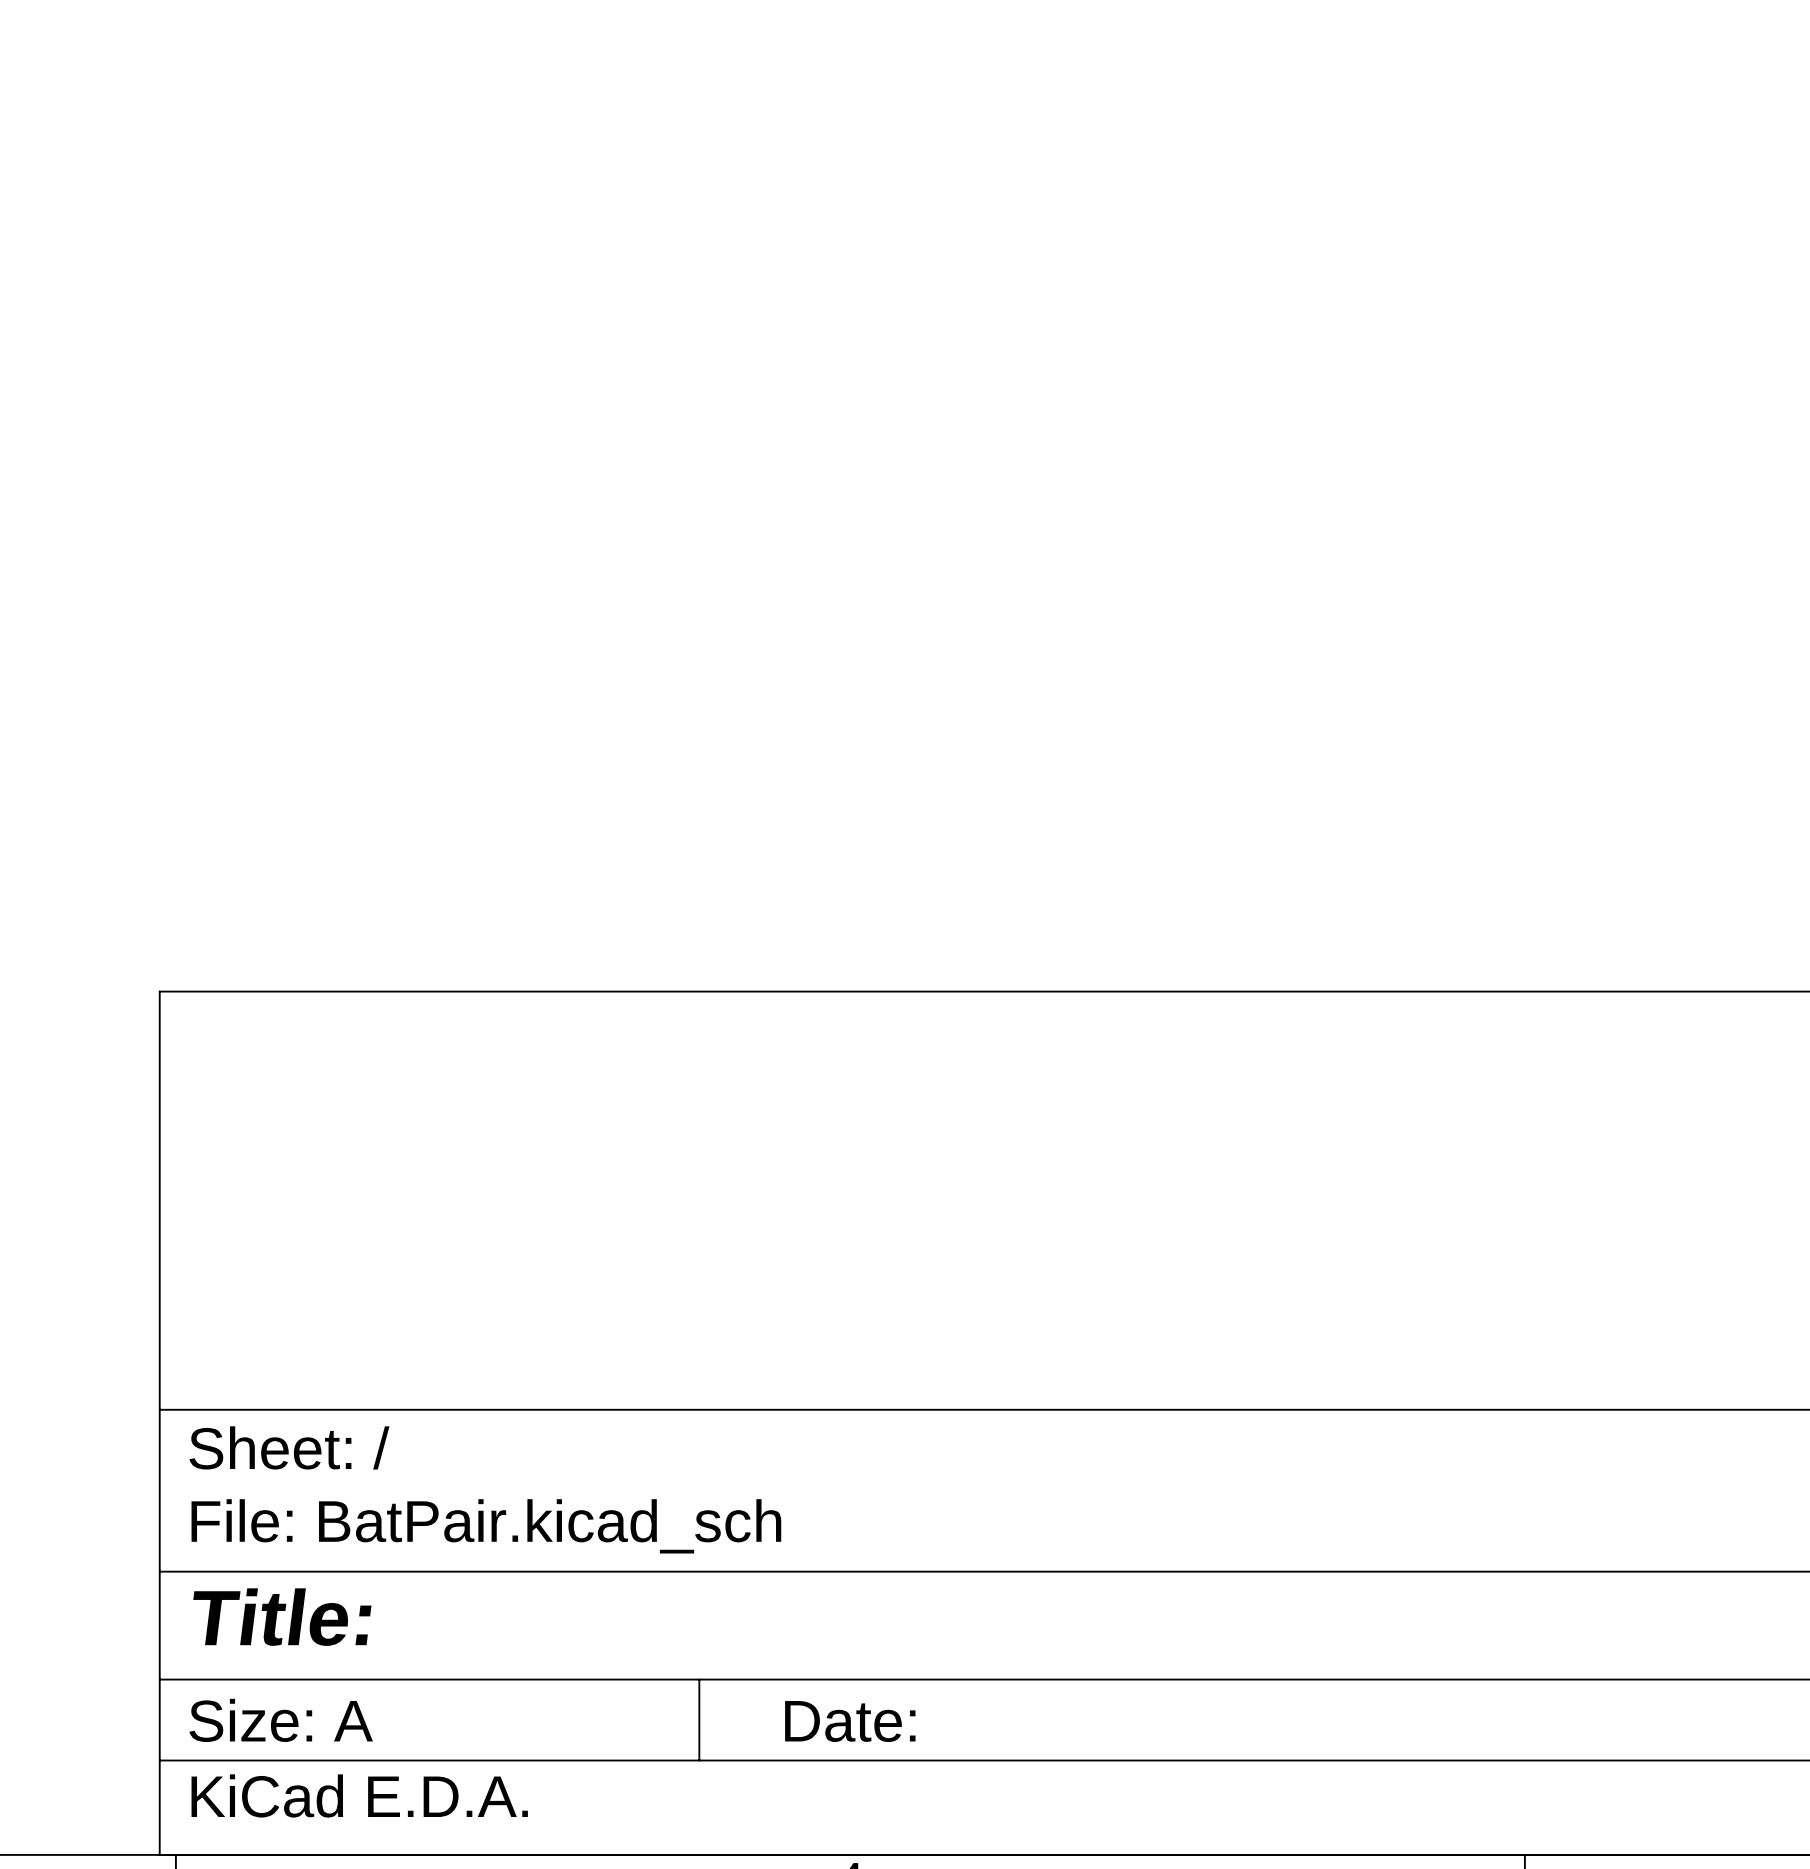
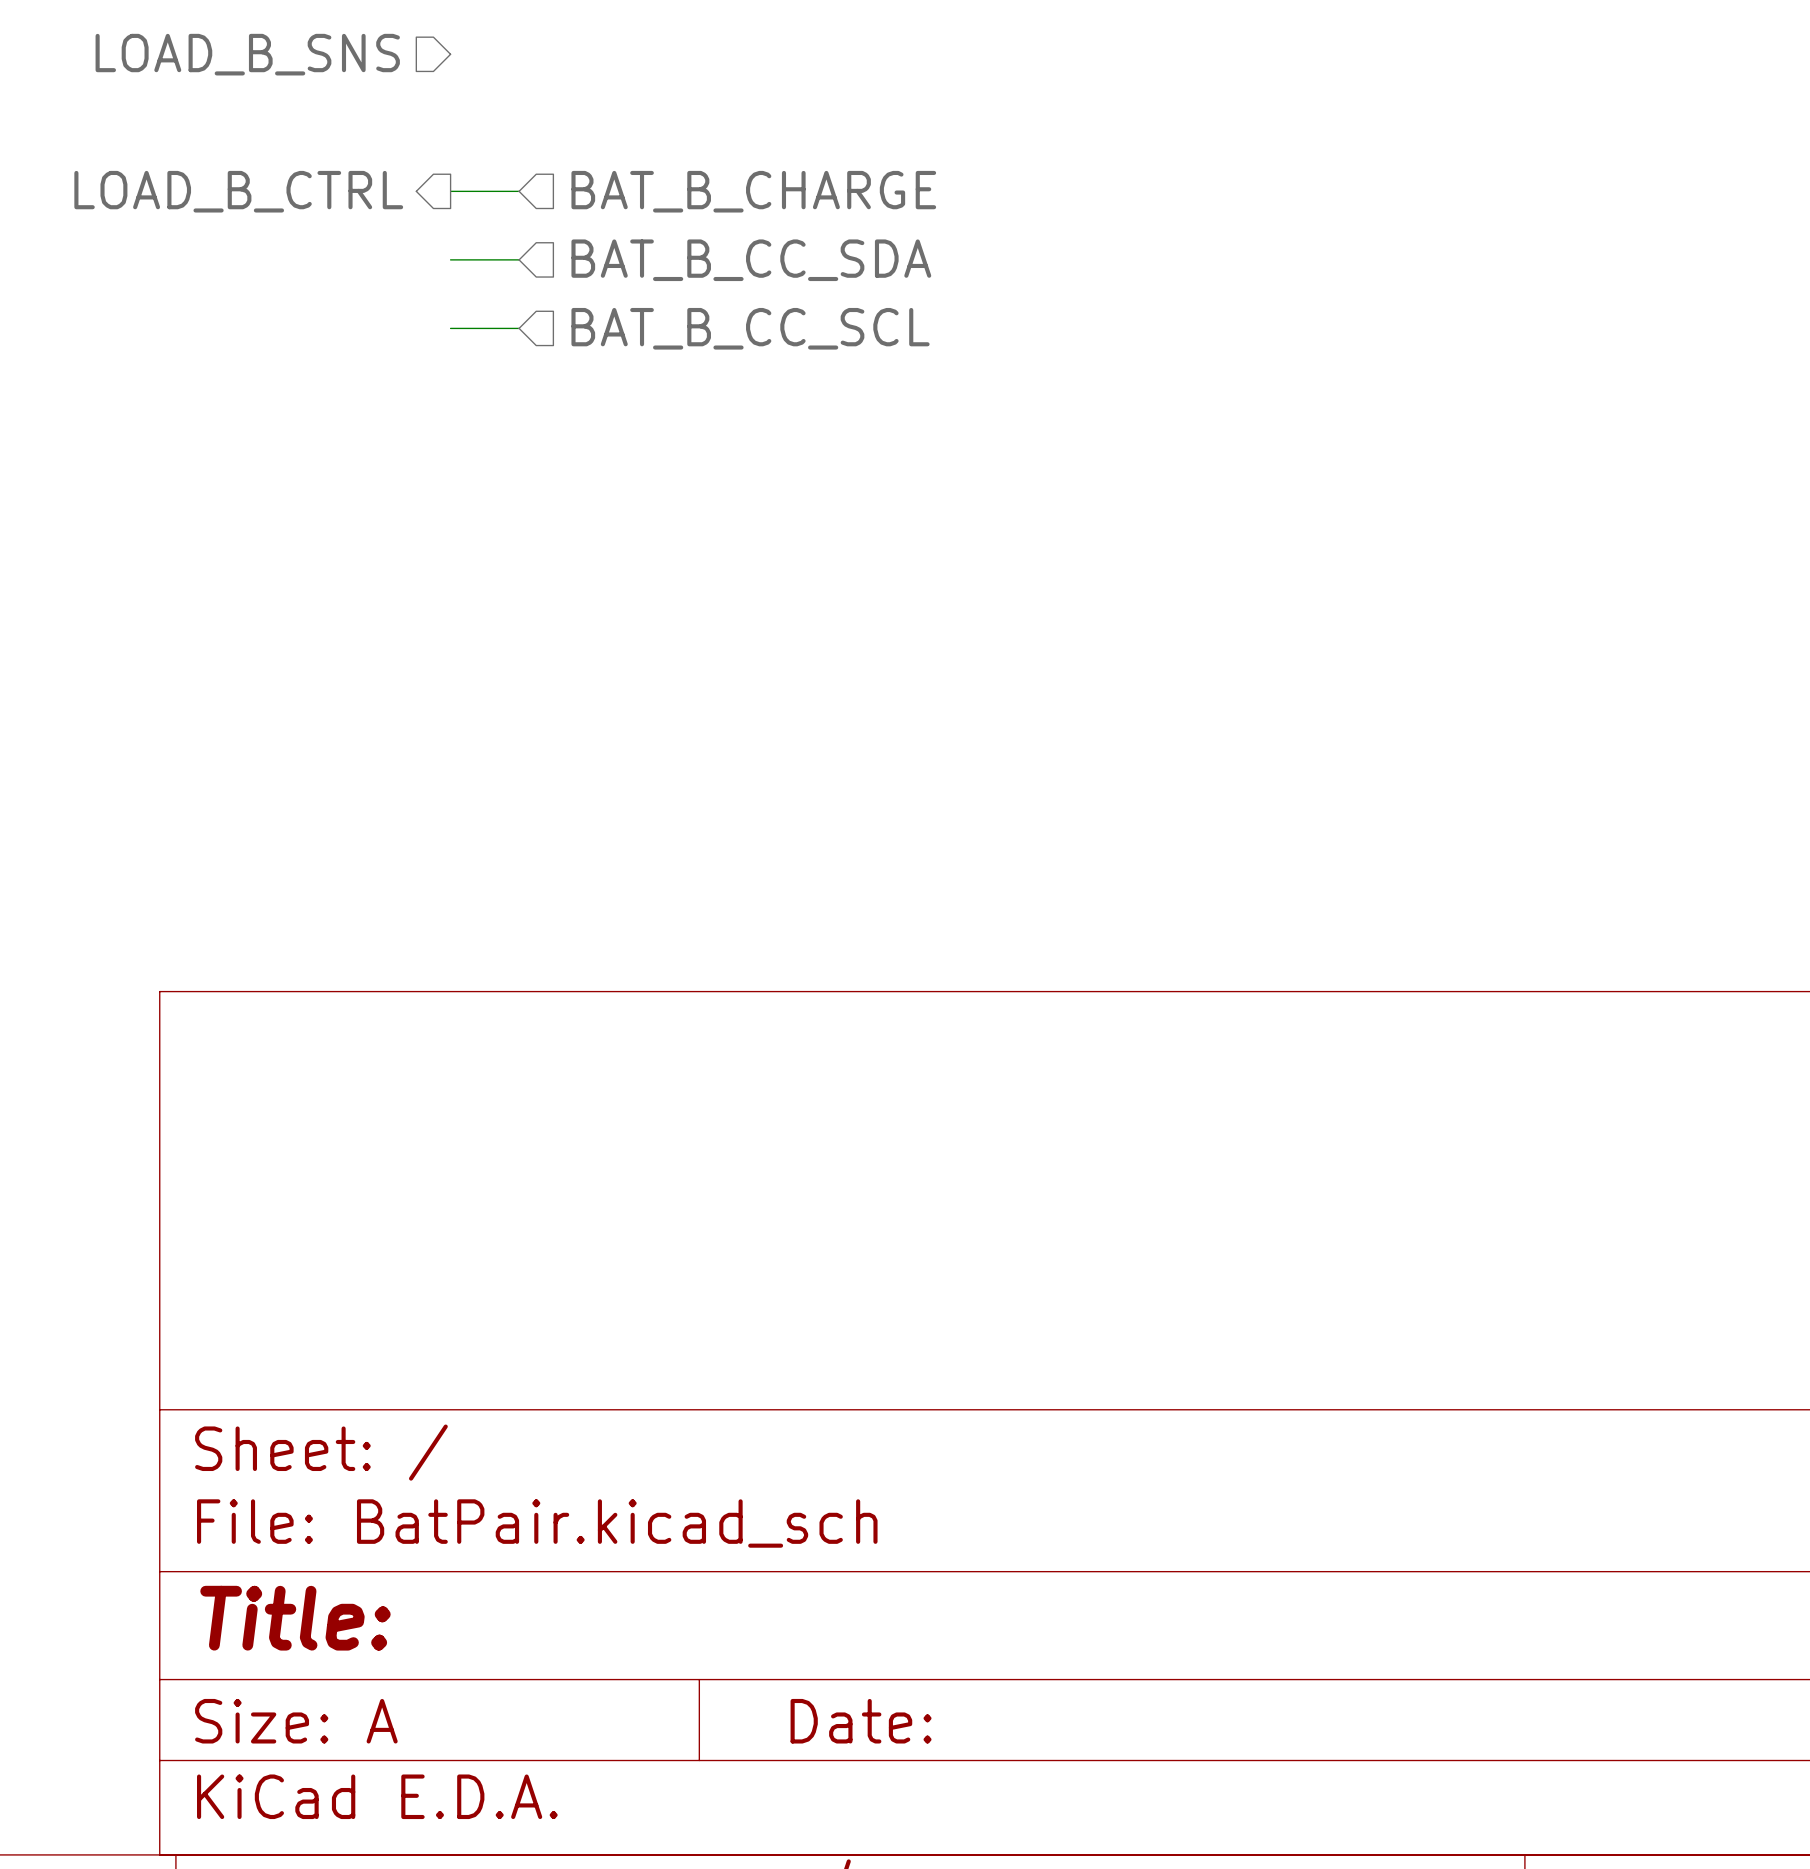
sheet pin: none -> LOAD_B_SNS (247, 54)
wire: none -> (450, 191) (519, 191)
sheet pin: none -> LOAD_B_CTRL (238, 191)
hierarchical label: none -> BAT_B_CHARGE (753, 191)
wire: none -> (450, 259) (519, 259)
hierarchical label: none -> BAT_B_CC_SDA (751, 260)
wire: none -> (450, 328) (519, 328)
hierarchical label: none -> BAT_B_CC_SCL (750, 328)

